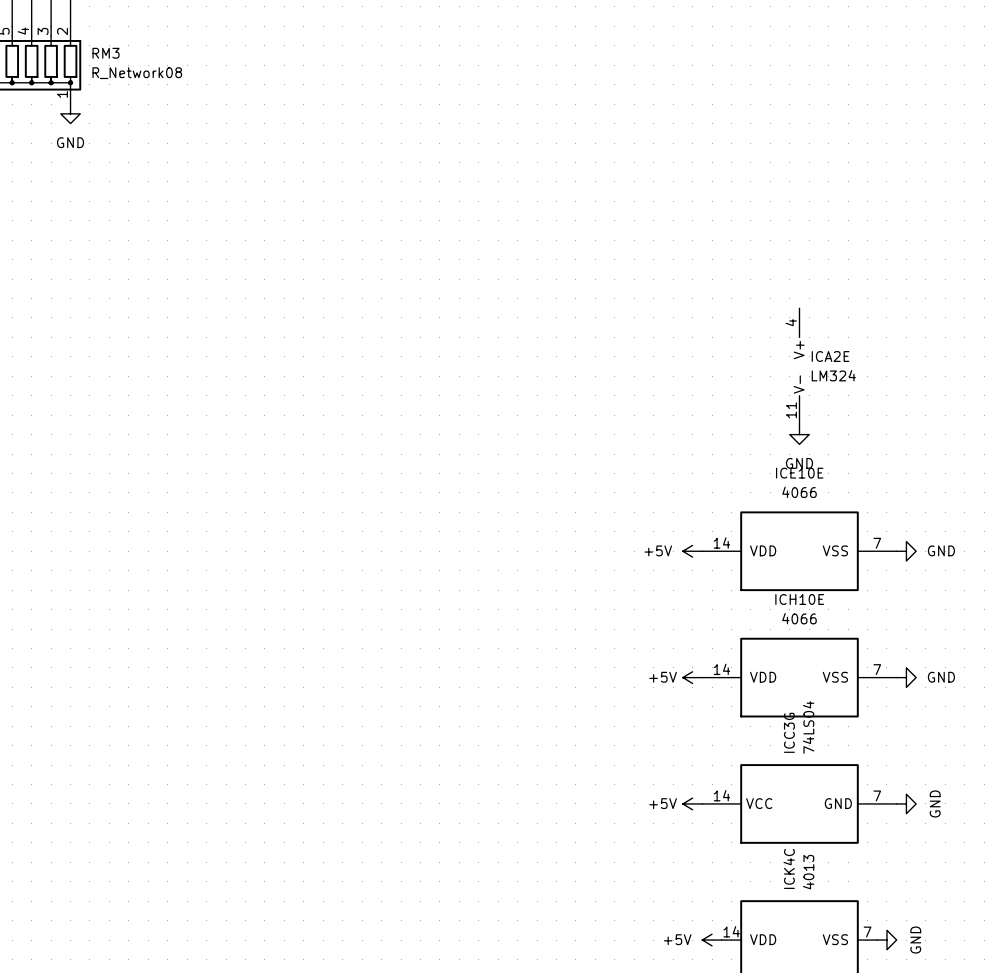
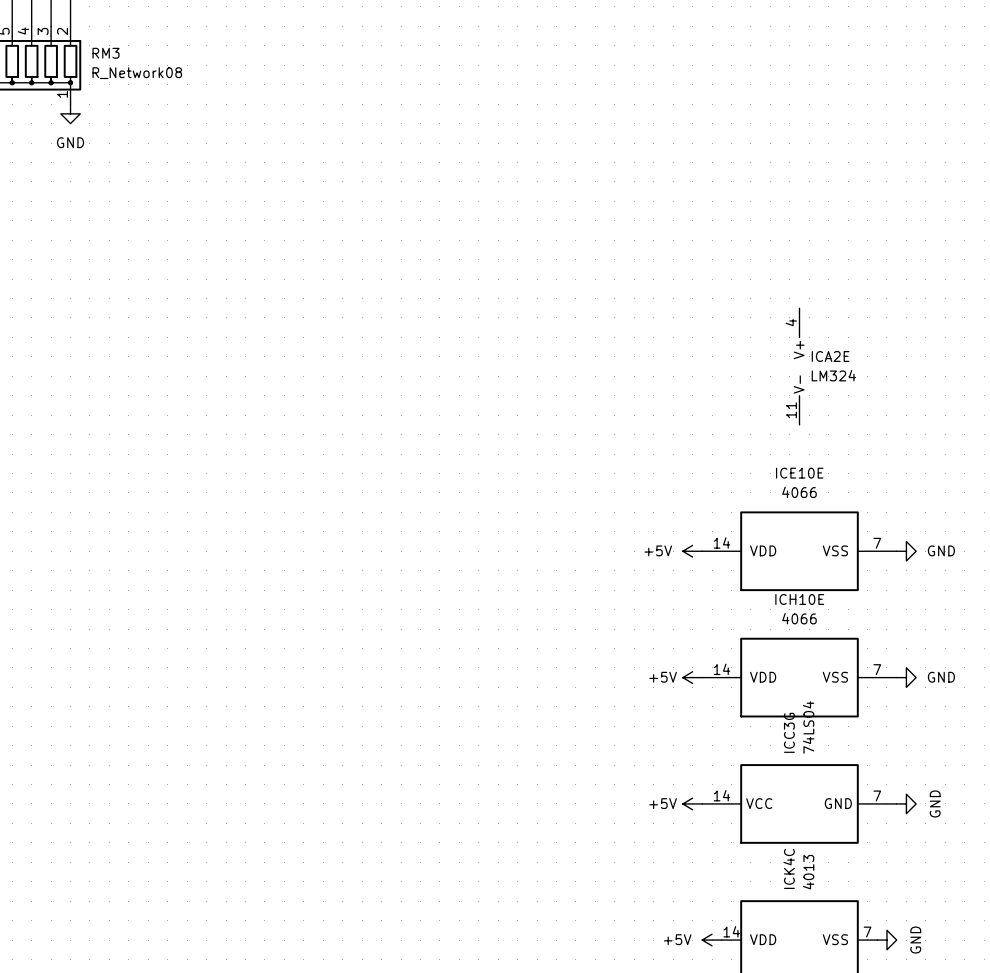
power symbol: GND (799, 434) -> none

